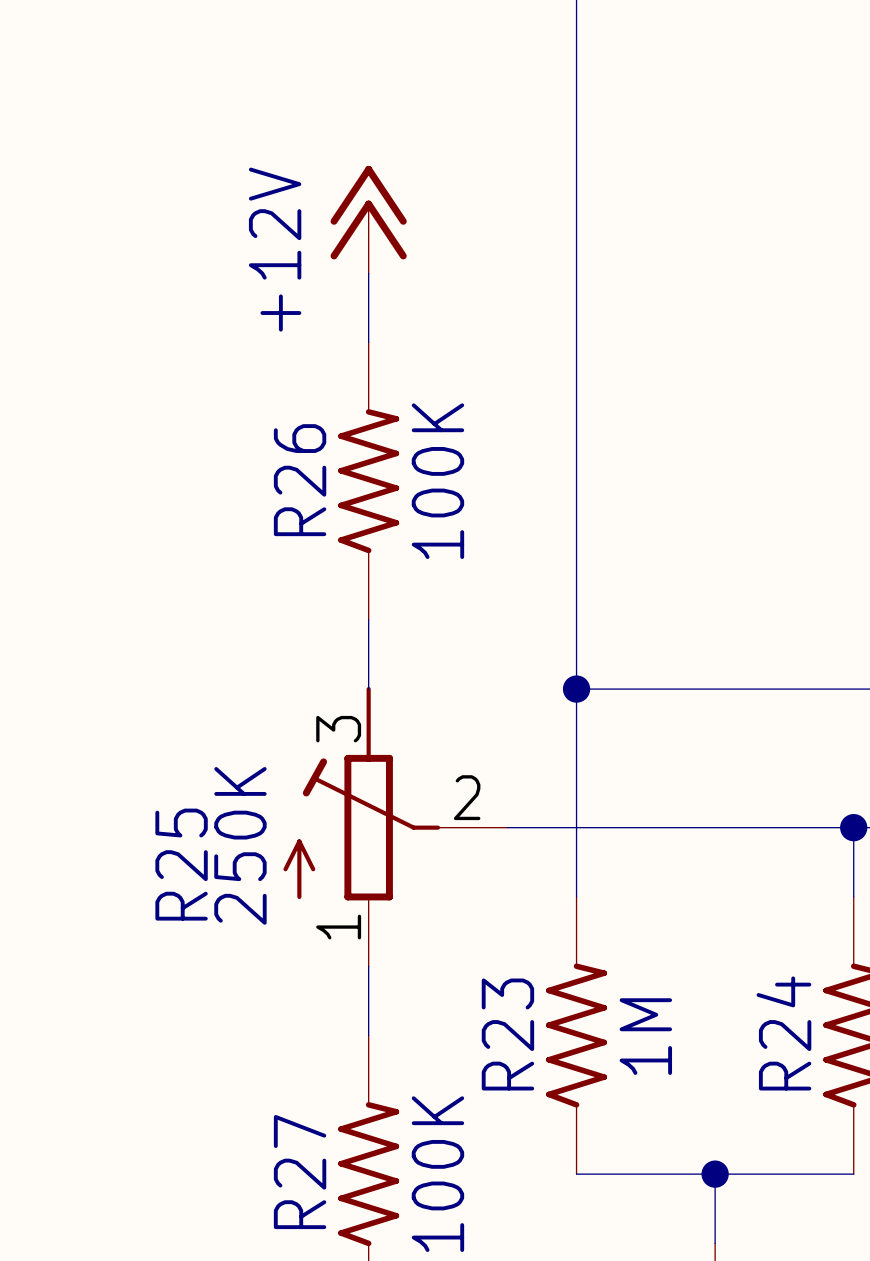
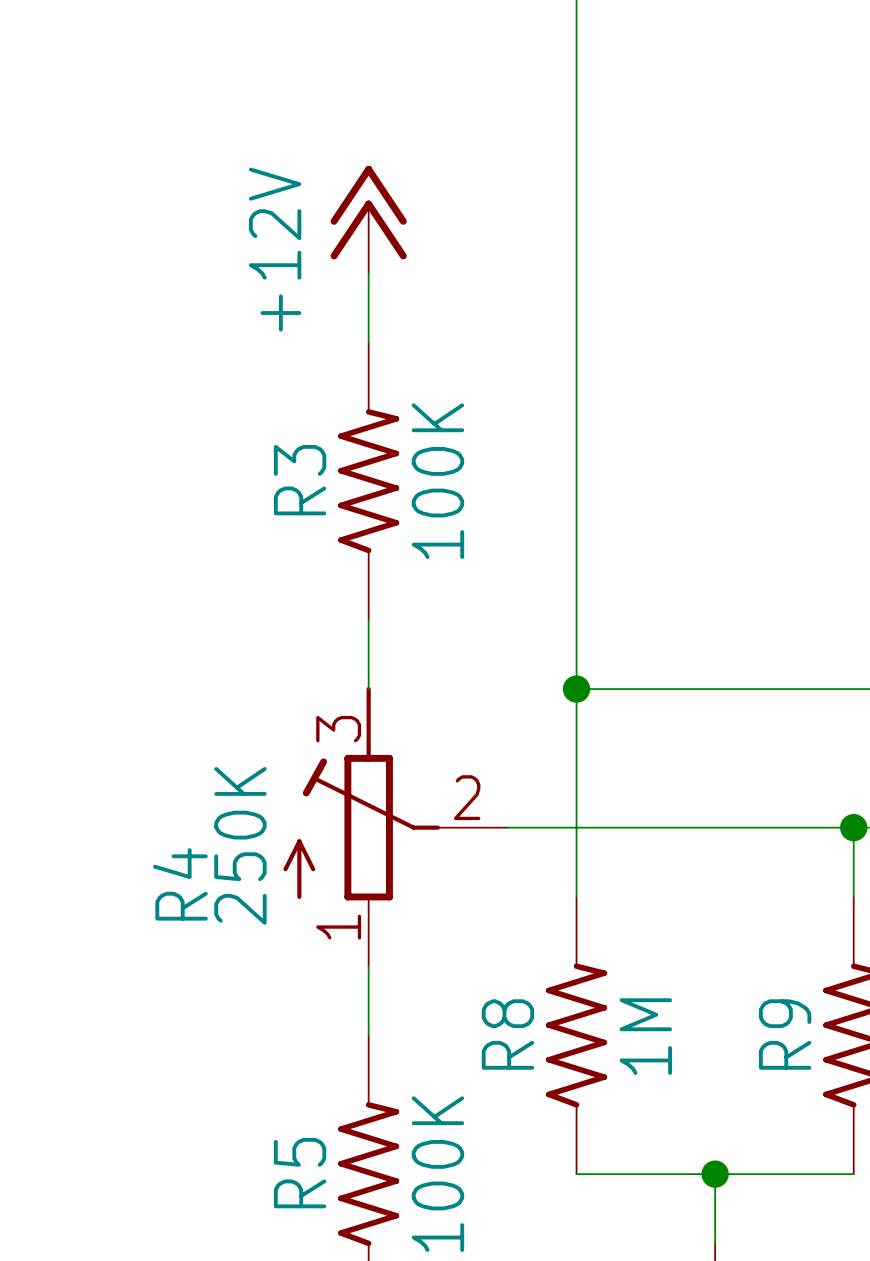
R26 name: R26 (300, 480) -> R3 (300, 480)
R25 name: R25 (181, 864) -> R4 (180, 884)
R24 name: R24 (783, 1033) -> R9 (785, 1034)
R23 name: R23 (507, 1034) -> R8 (507, 1034)
R27 name: R27 (300, 1172) -> R5 (300, 1173)

